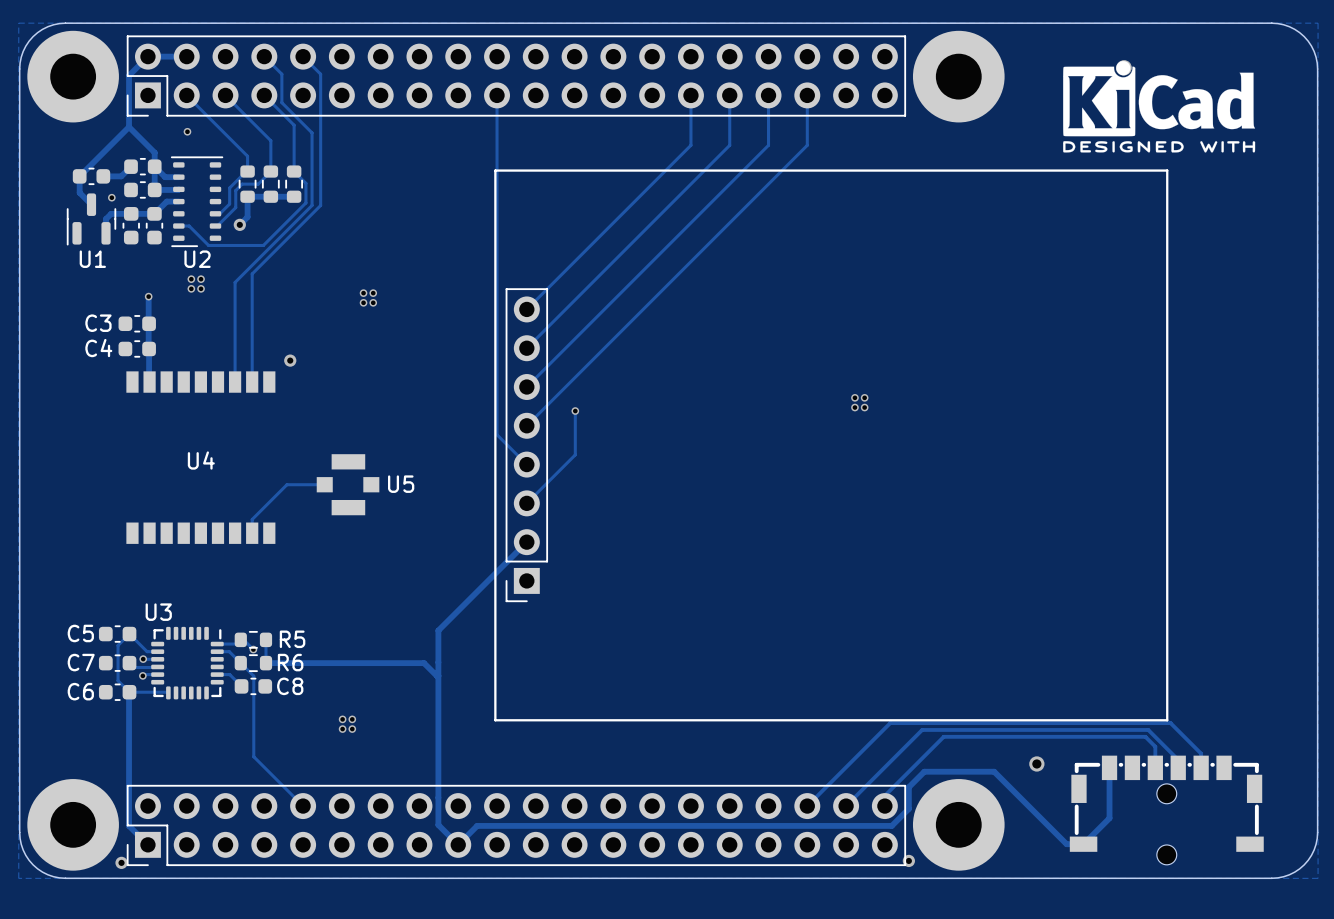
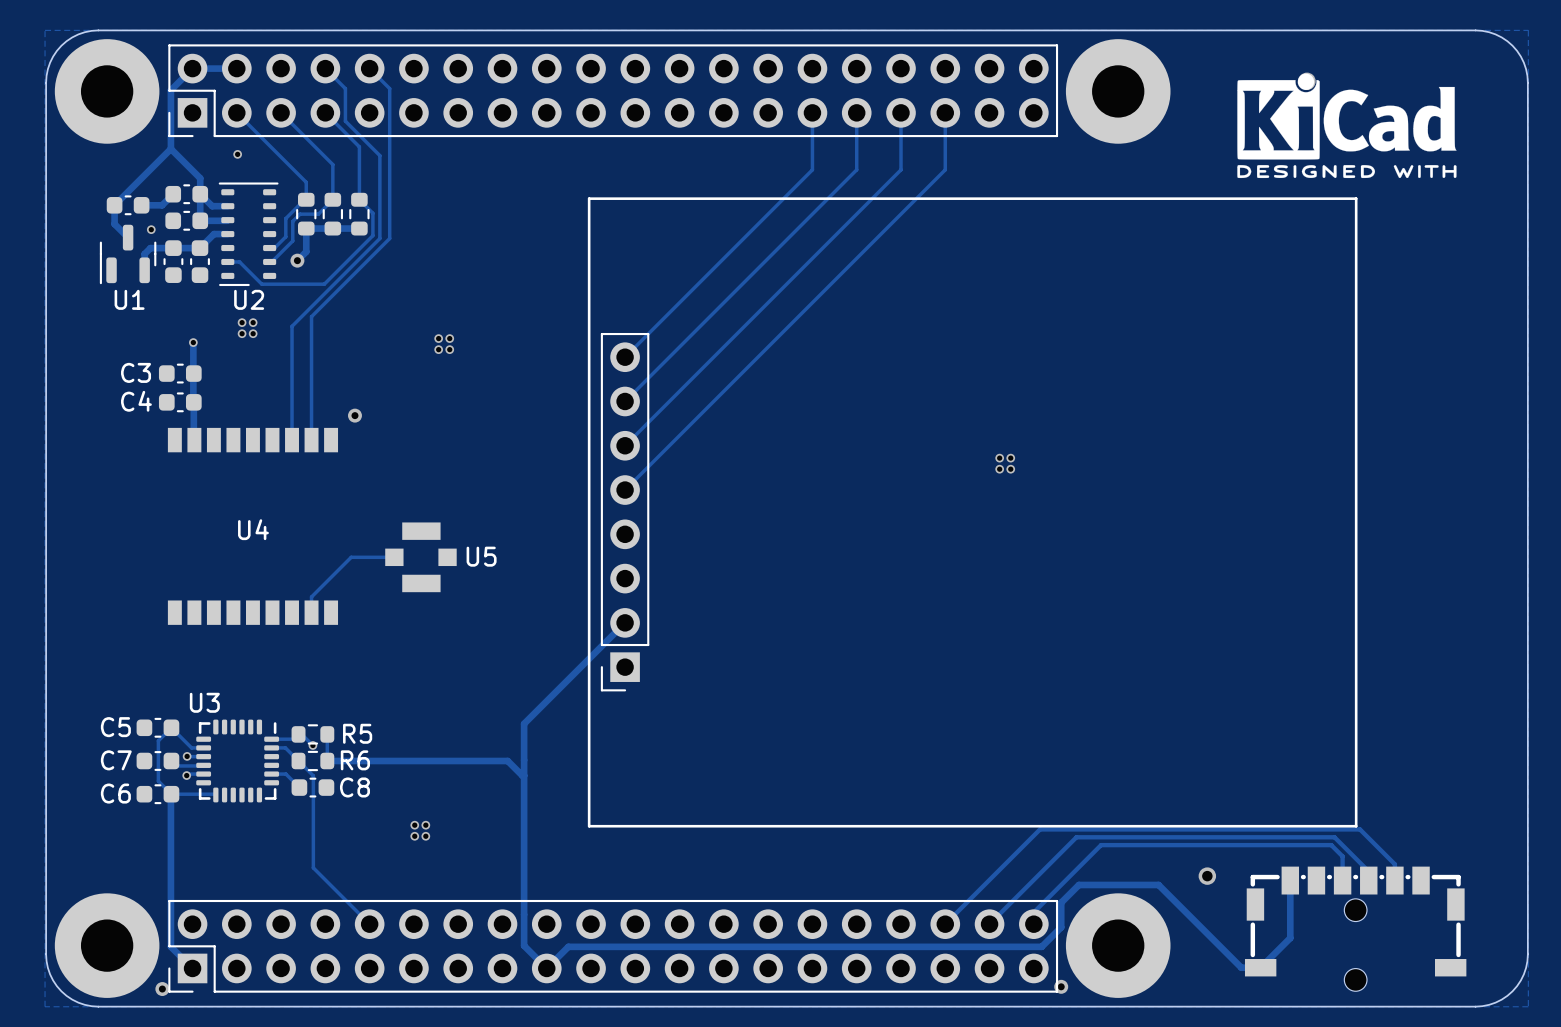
track: (497, 95) (497, 434) (526, 464) -> none
track: (575, 411) (575, 454) (526, 503) -> none
via: (575, 411) -> none

